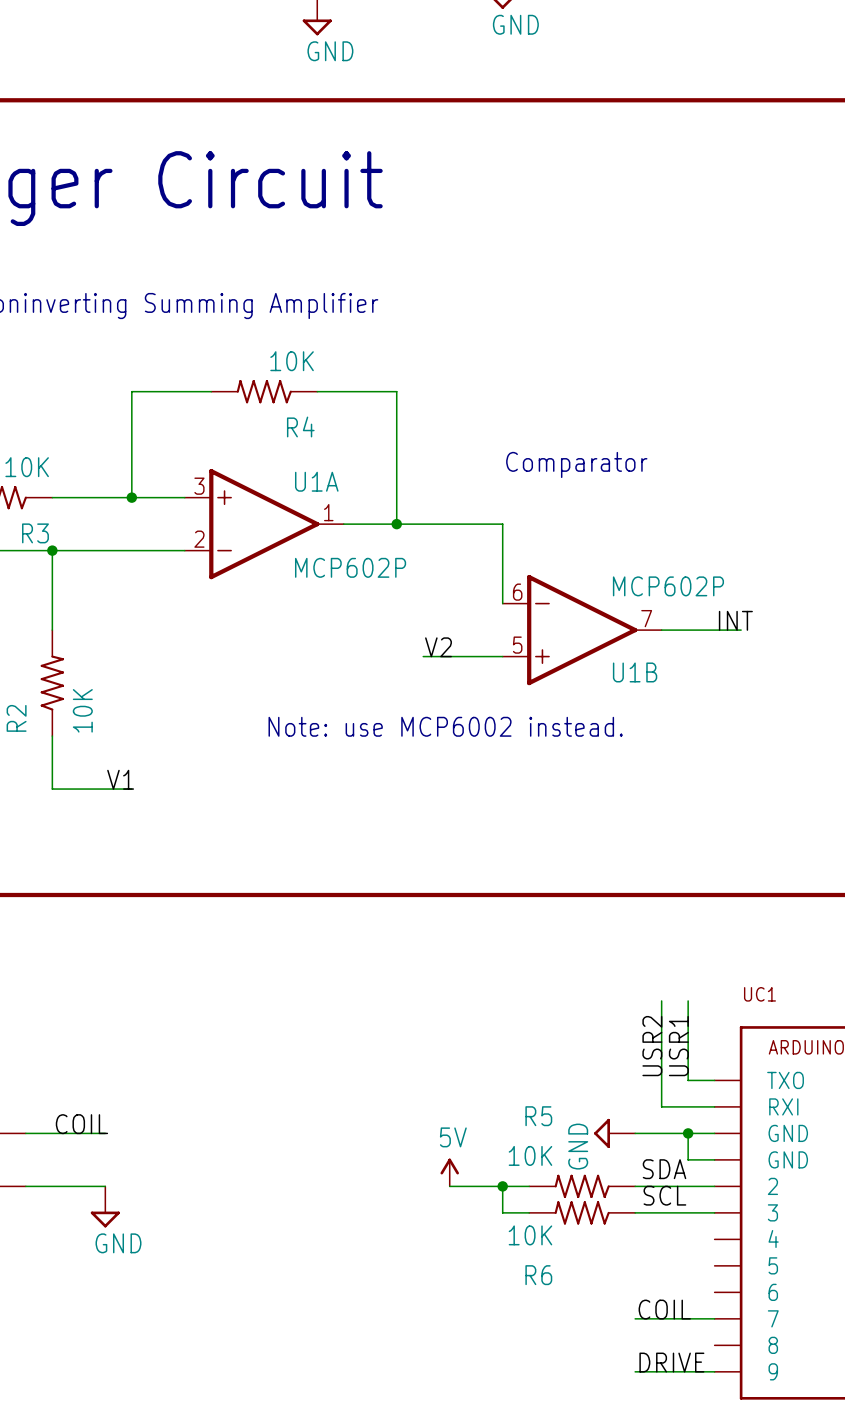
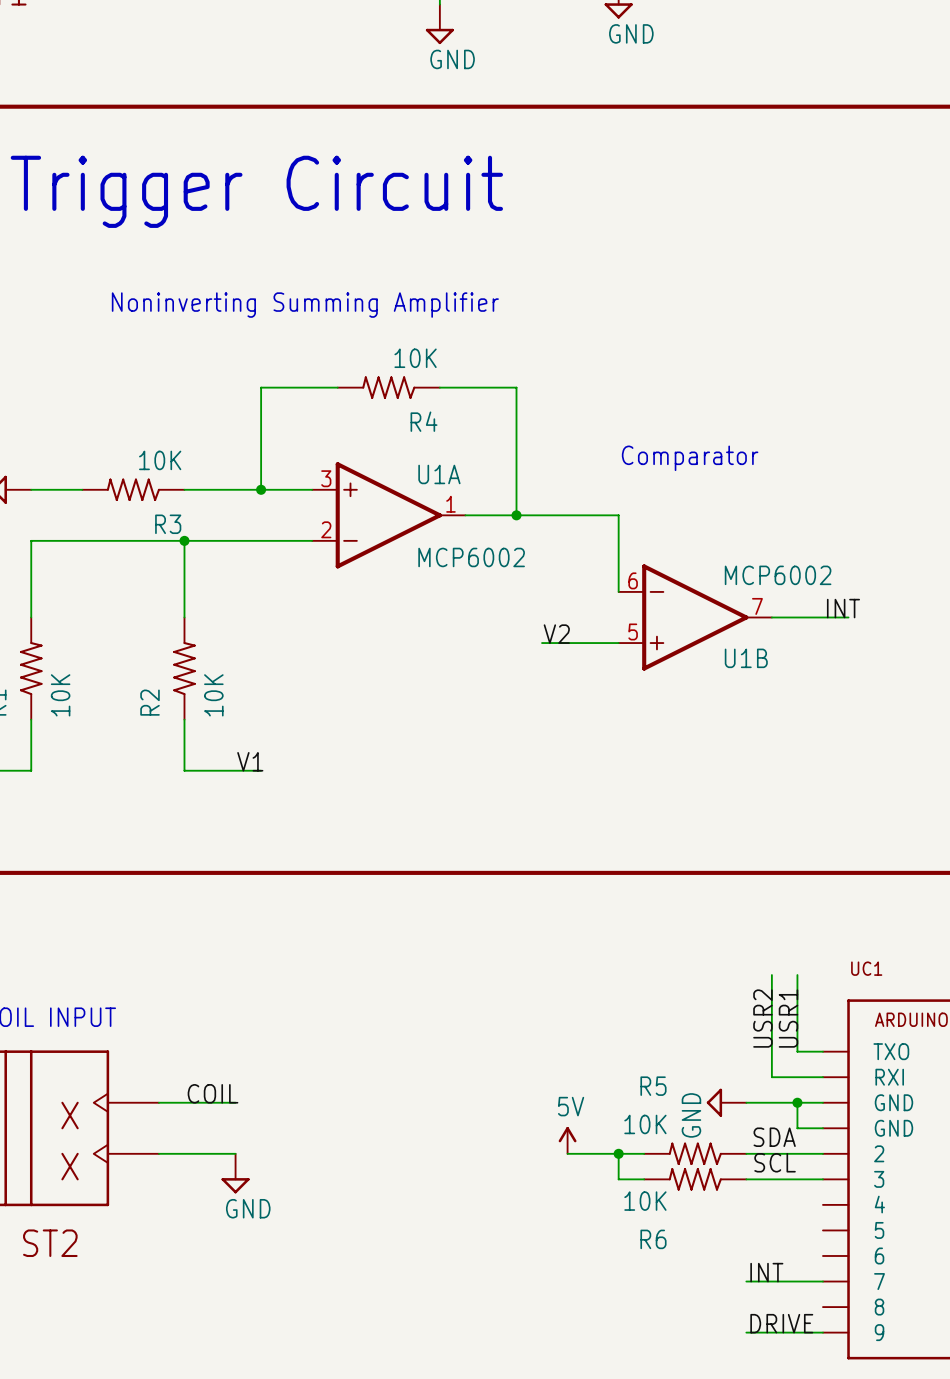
U1A value: MCP602P (350, 567) -> MCP6002 (471, 557)
U1B value: MCP602P (668, 586) -> MCP6002 (778, 575)
text: Note: use MCP6002 instead. (445, 726) -> none
label: COIL (664, 1309) -> INT (766, 1272)

